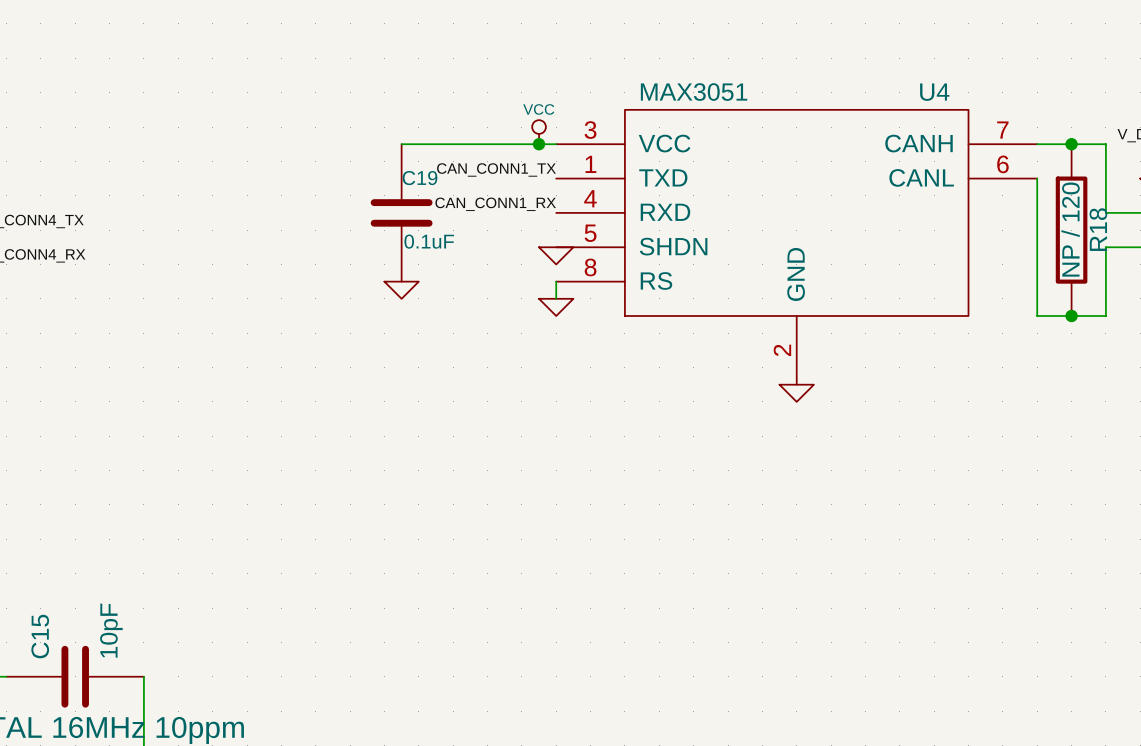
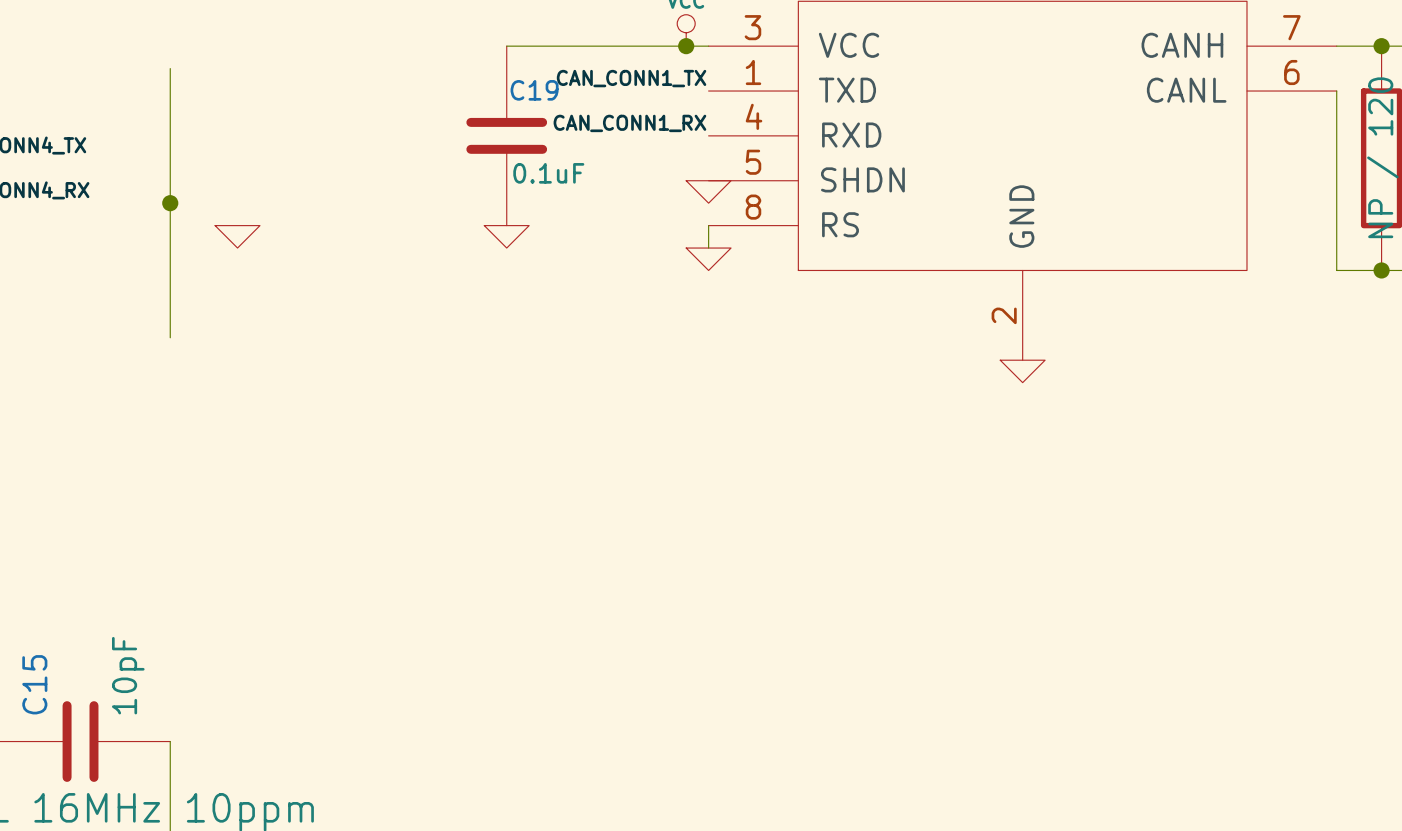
wire: none -> (170, 68) (170, 337)
junction: none -> (170, 203)
power symbol: none -> (237, 236)

